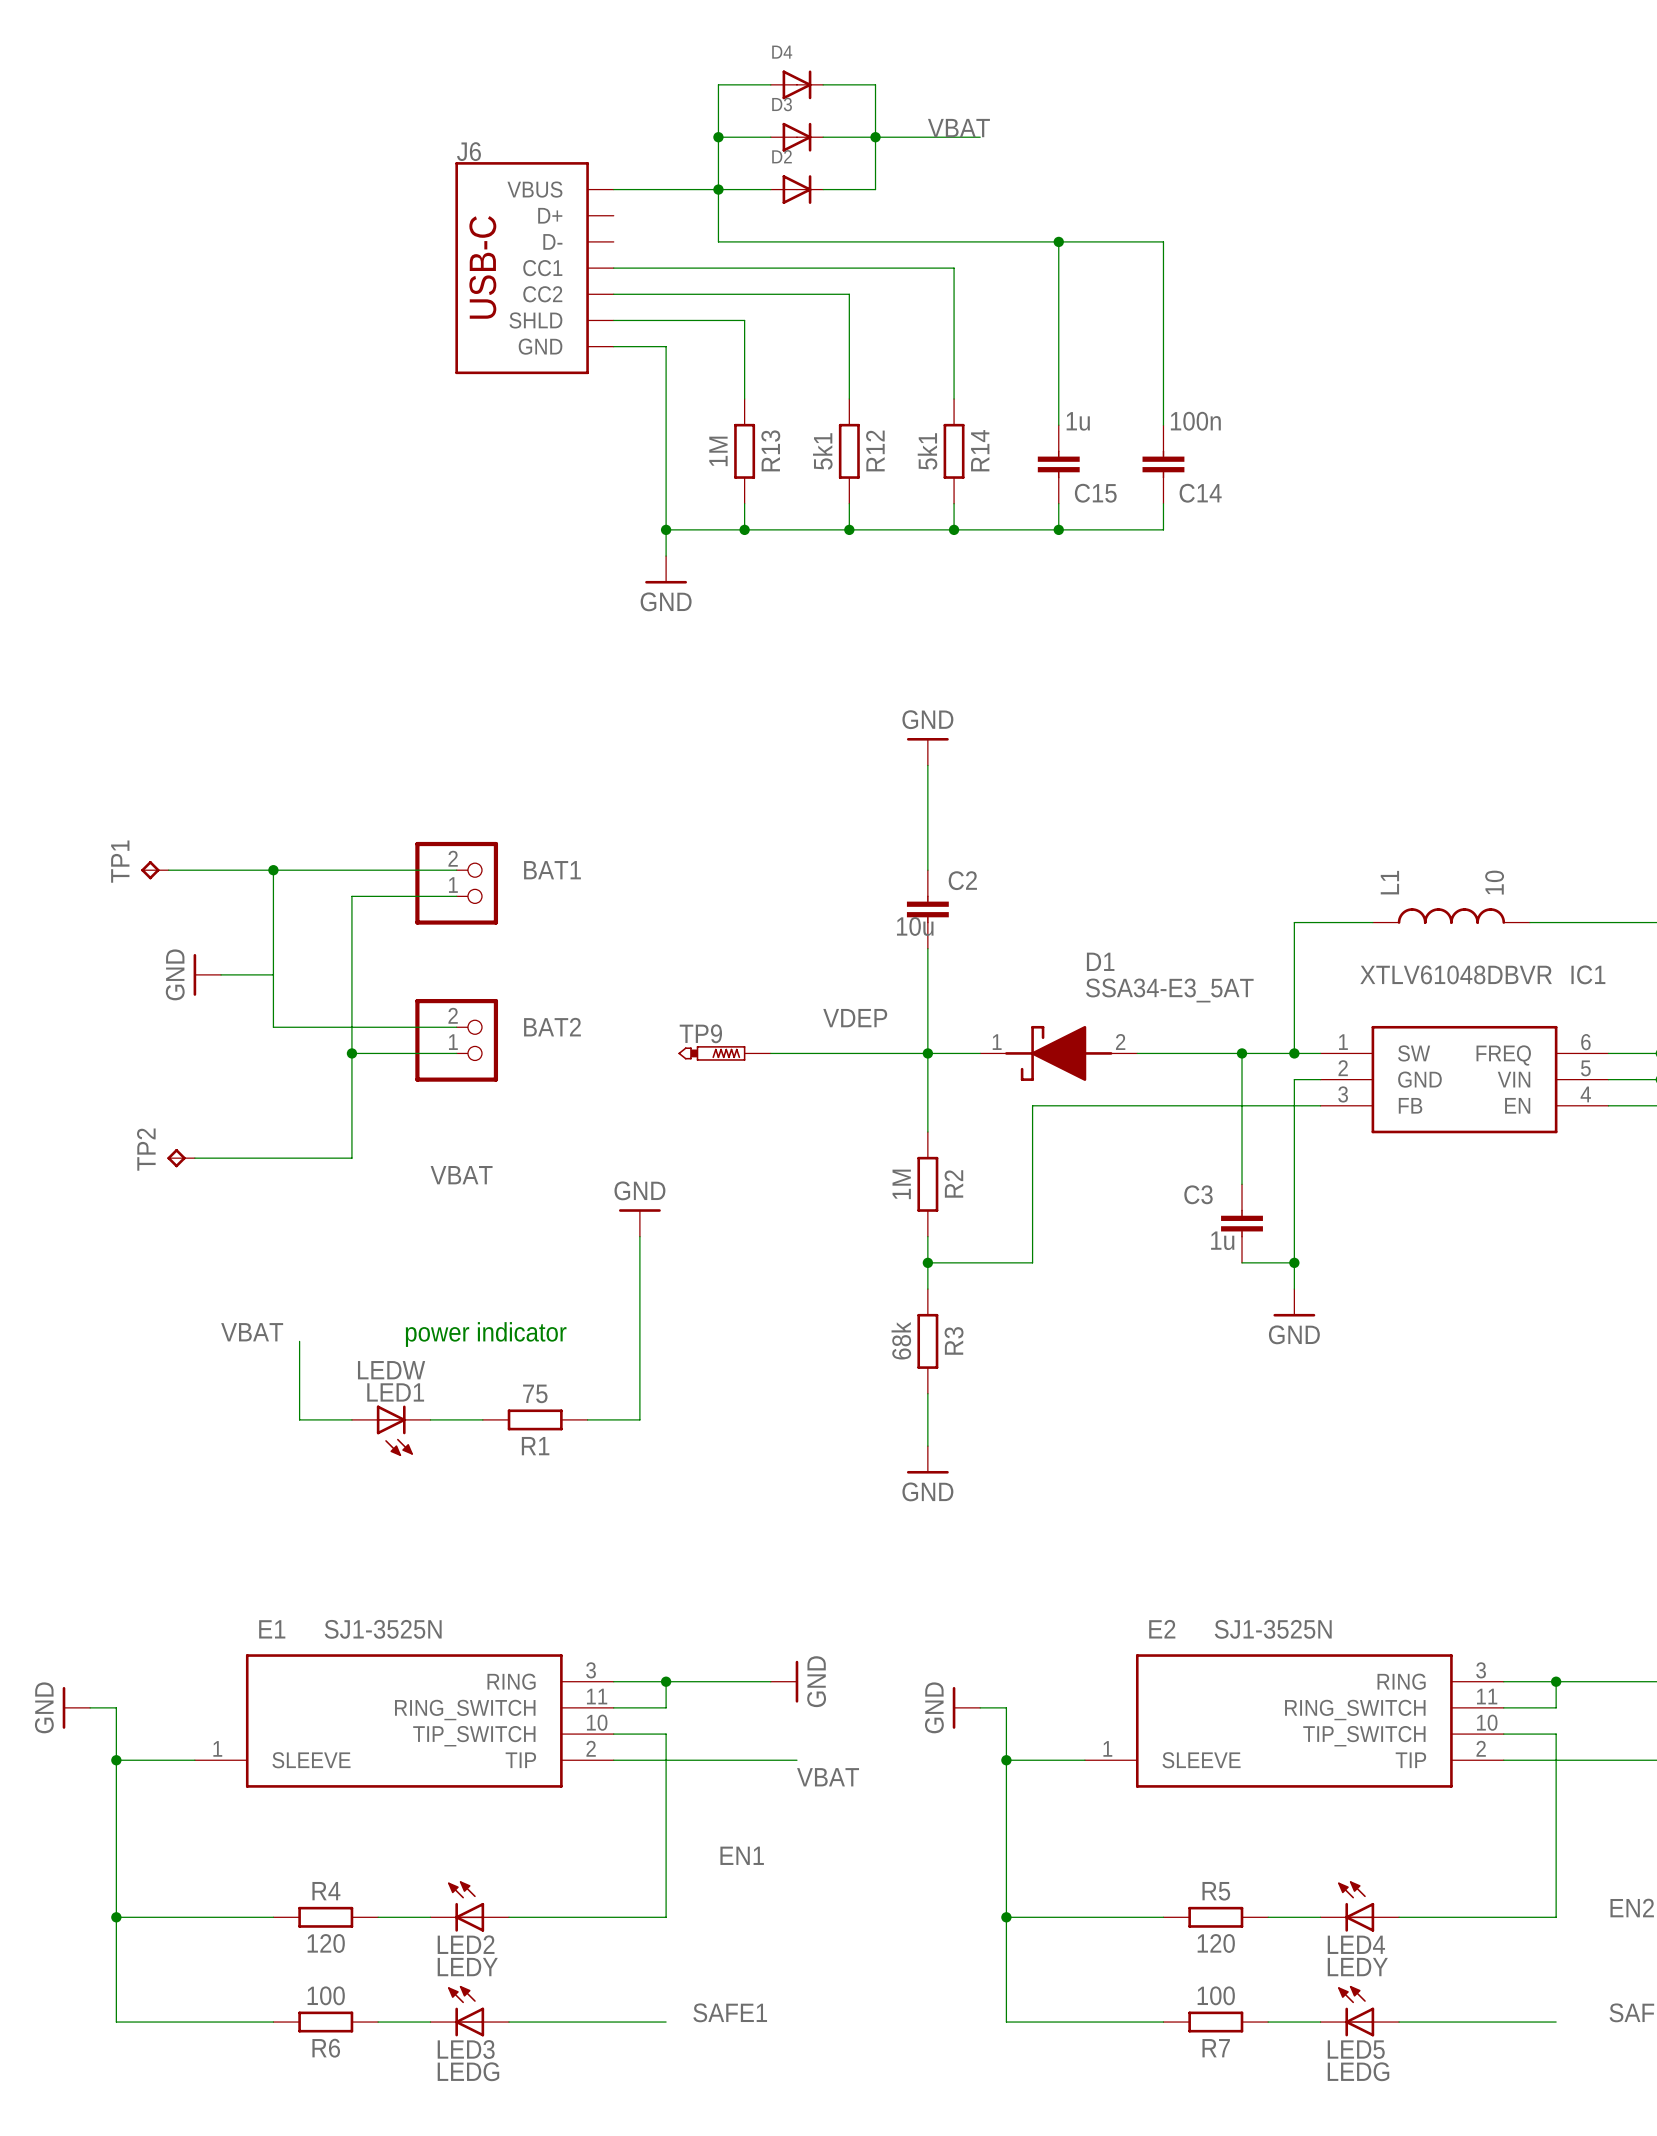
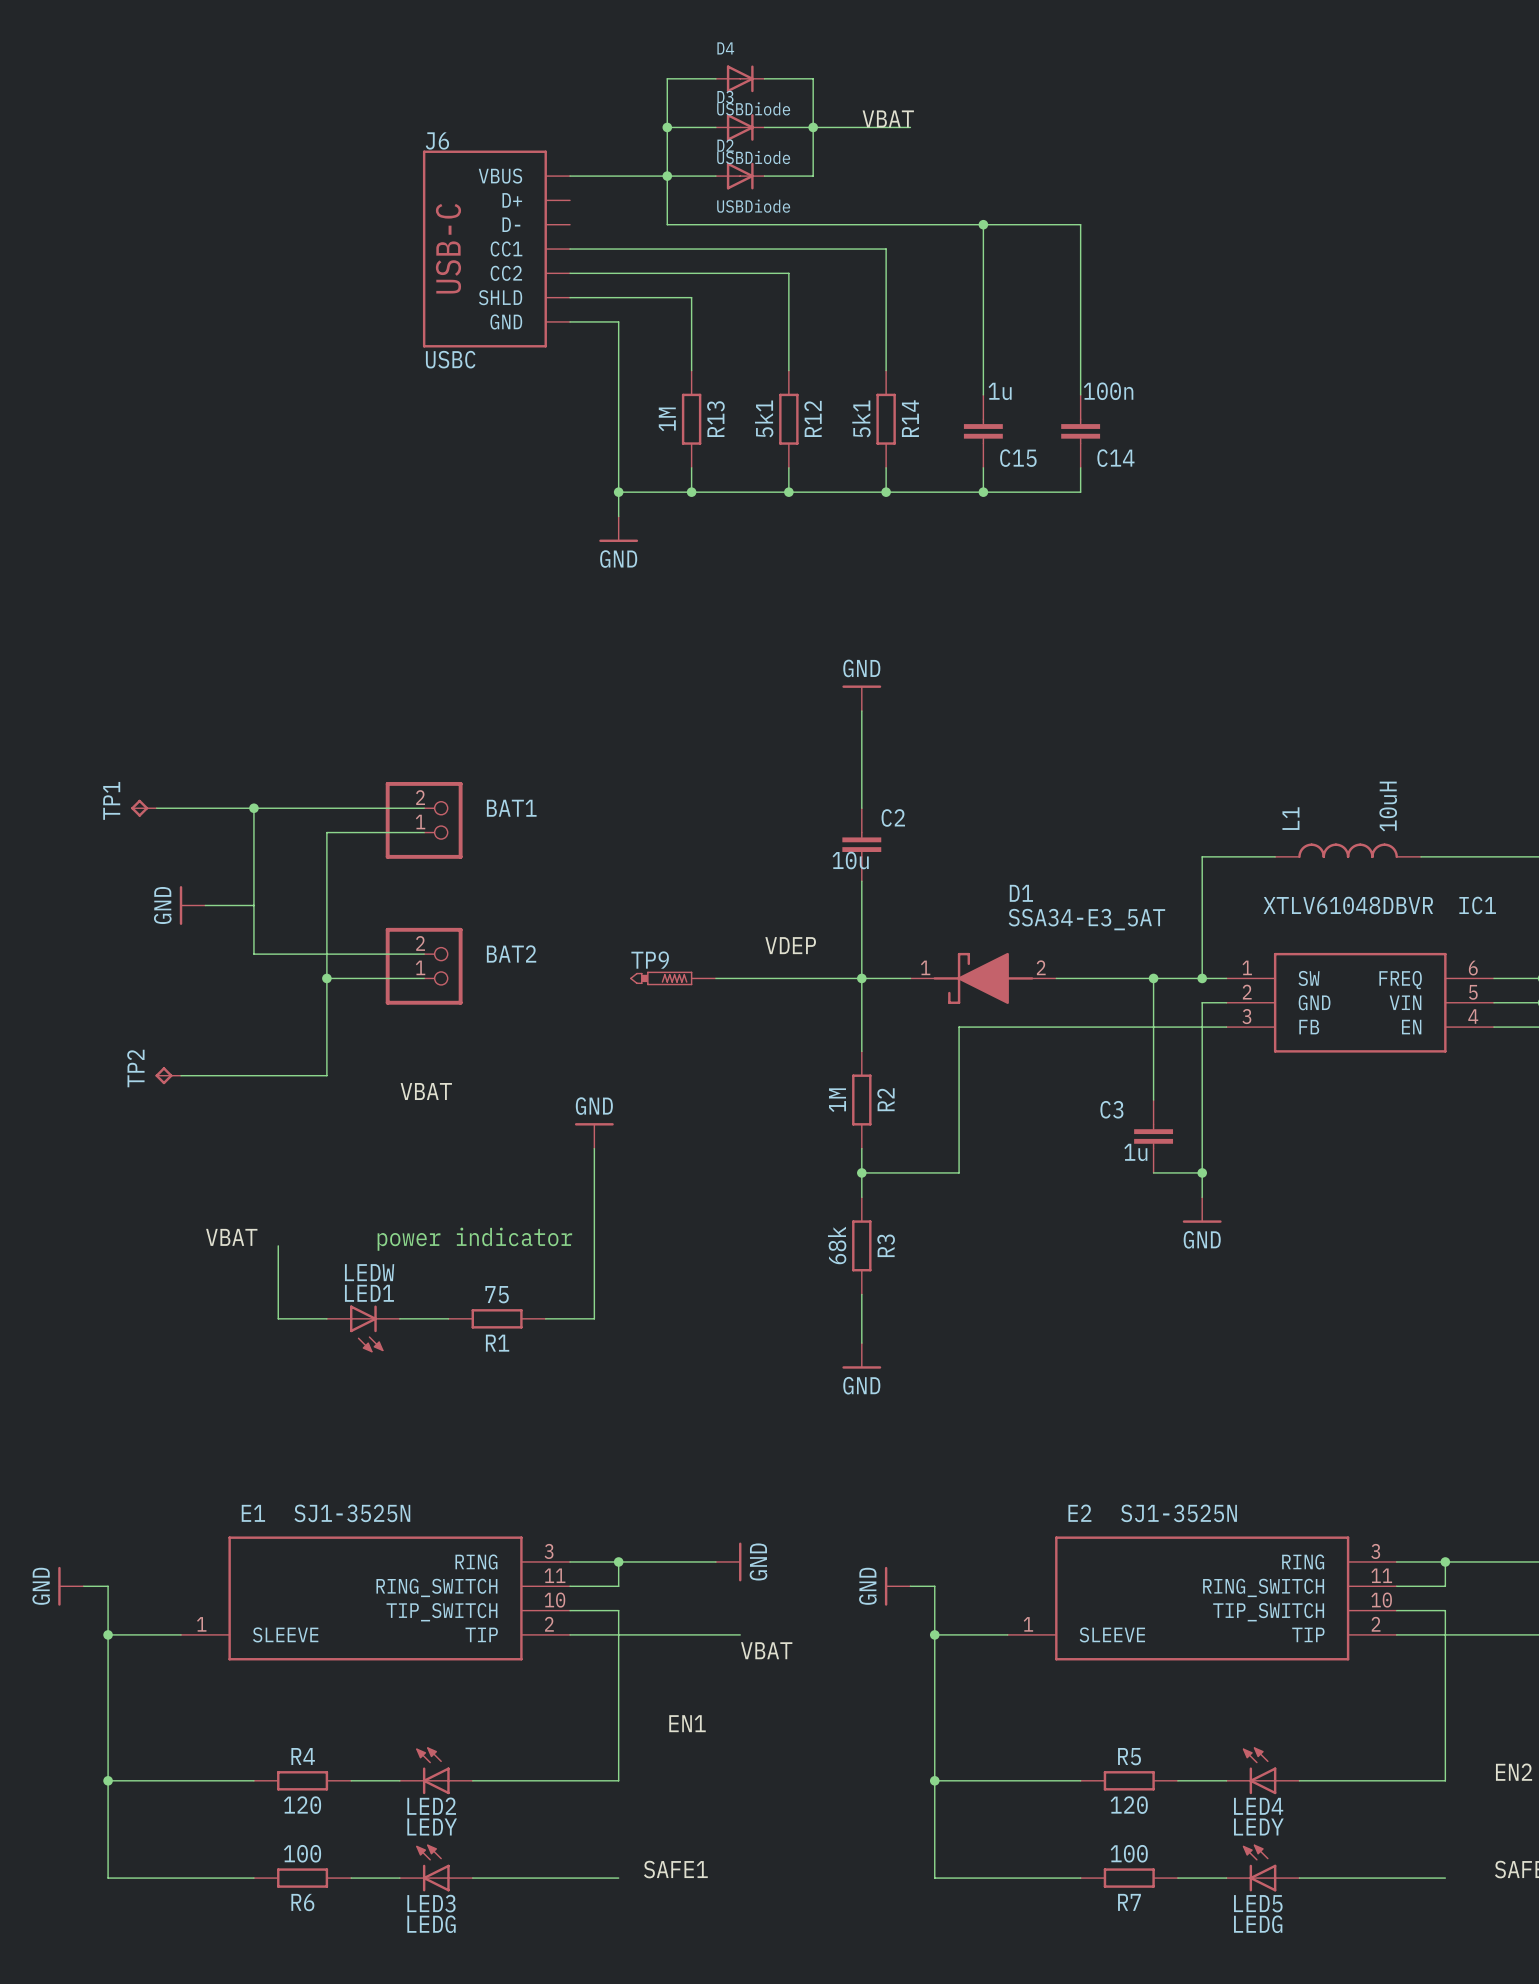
D4 value: none -> USBDiode (753, 108)
D3 value: none -> USBDiode (753, 157)
D2 value: none -> USBDiode (753, 206)
J6 value: none -> USBC (450, 359)
L1 value: 10 (1494, 882) -> 10uH (1388, 806)

